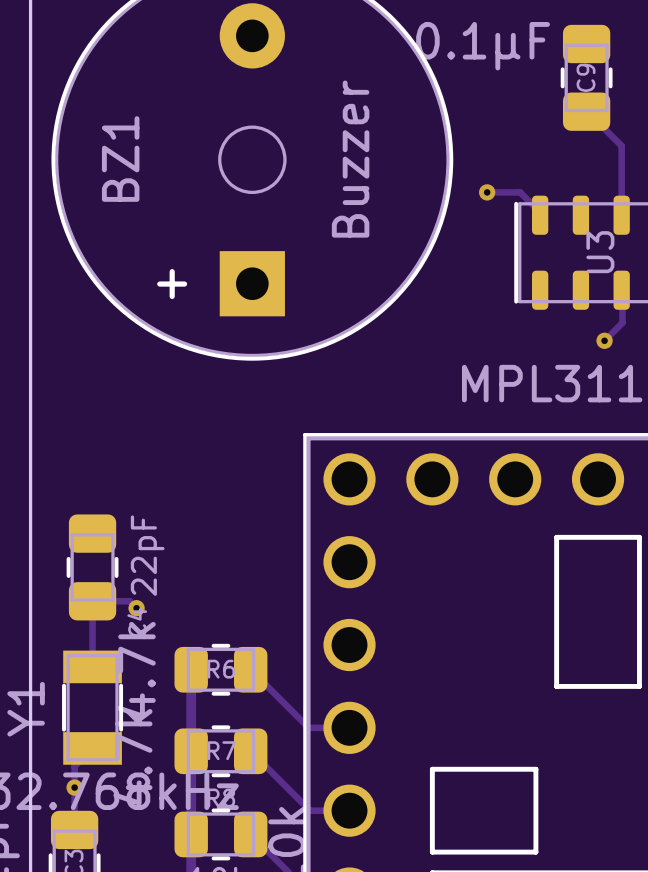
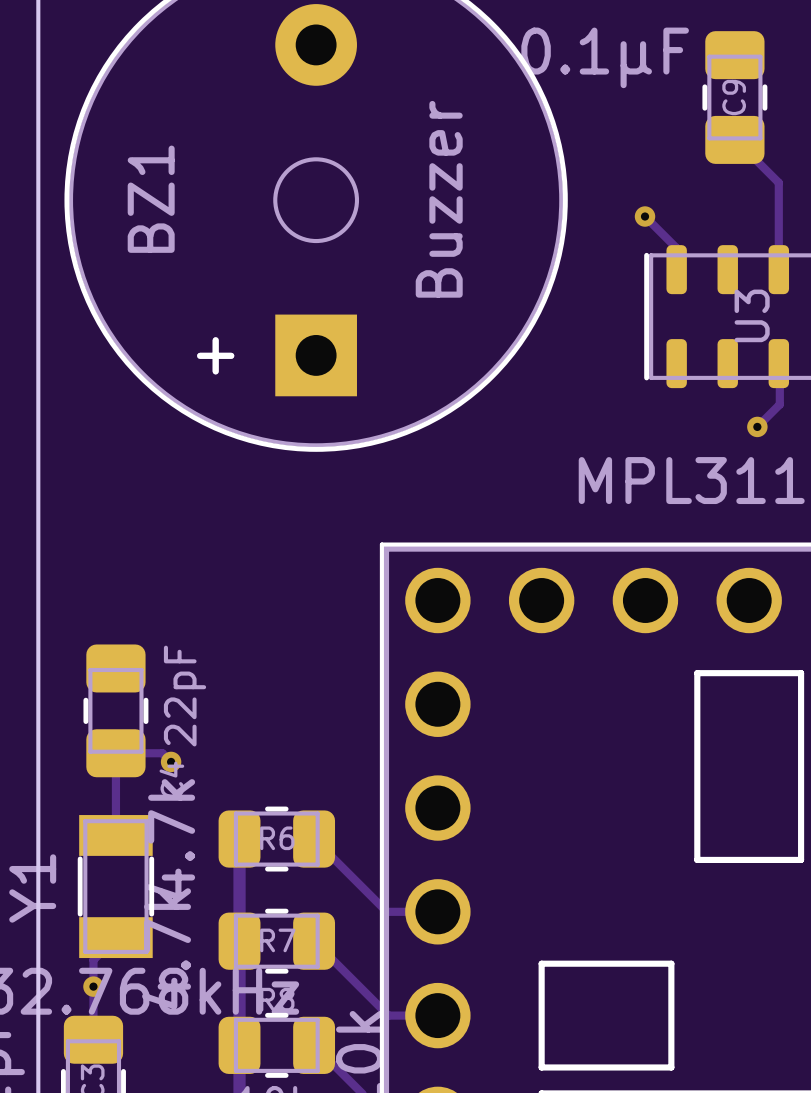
track: (487, 192) (520, 192) (539, 212) -> (645, 216) (676, 247) (676, 265)
via position: (487, 192) -> (645, 216)

